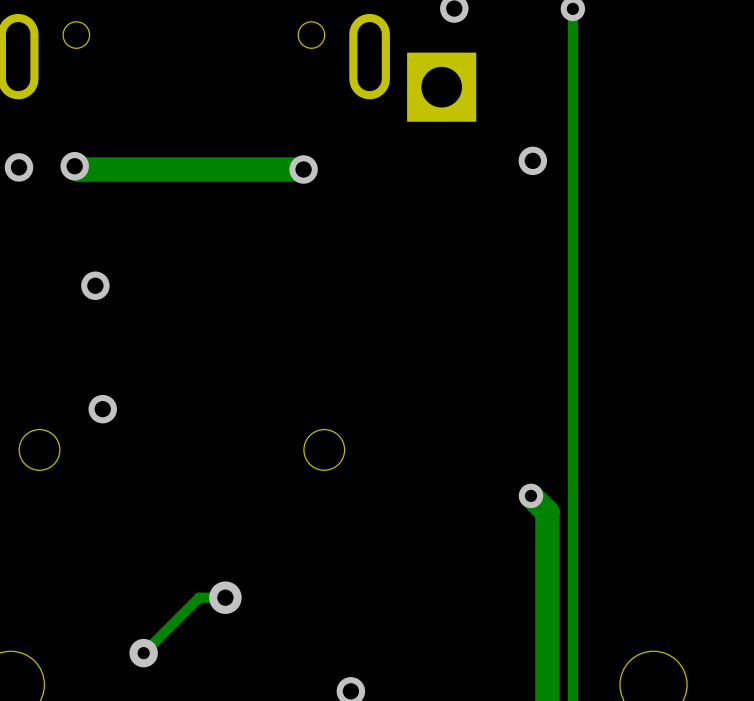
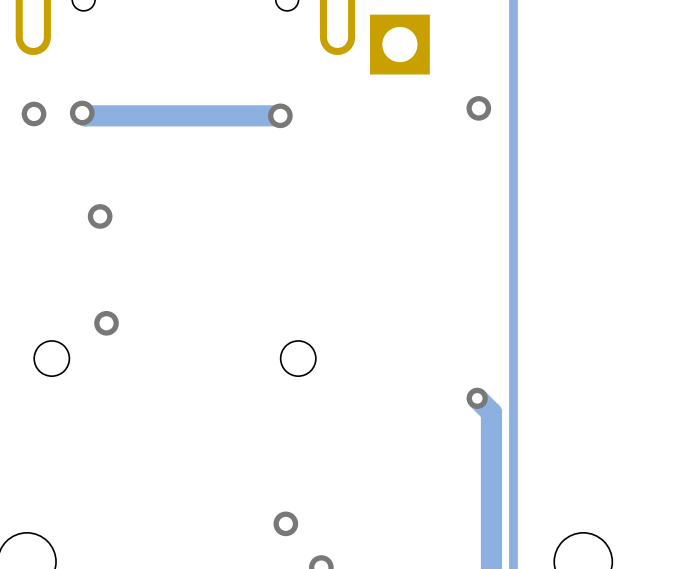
track: (225, 597) (199, 597) (143, 653) -> none
via: (225, 597) -> none
via: none -> (285, 523)
via: (143, 653) -> none

